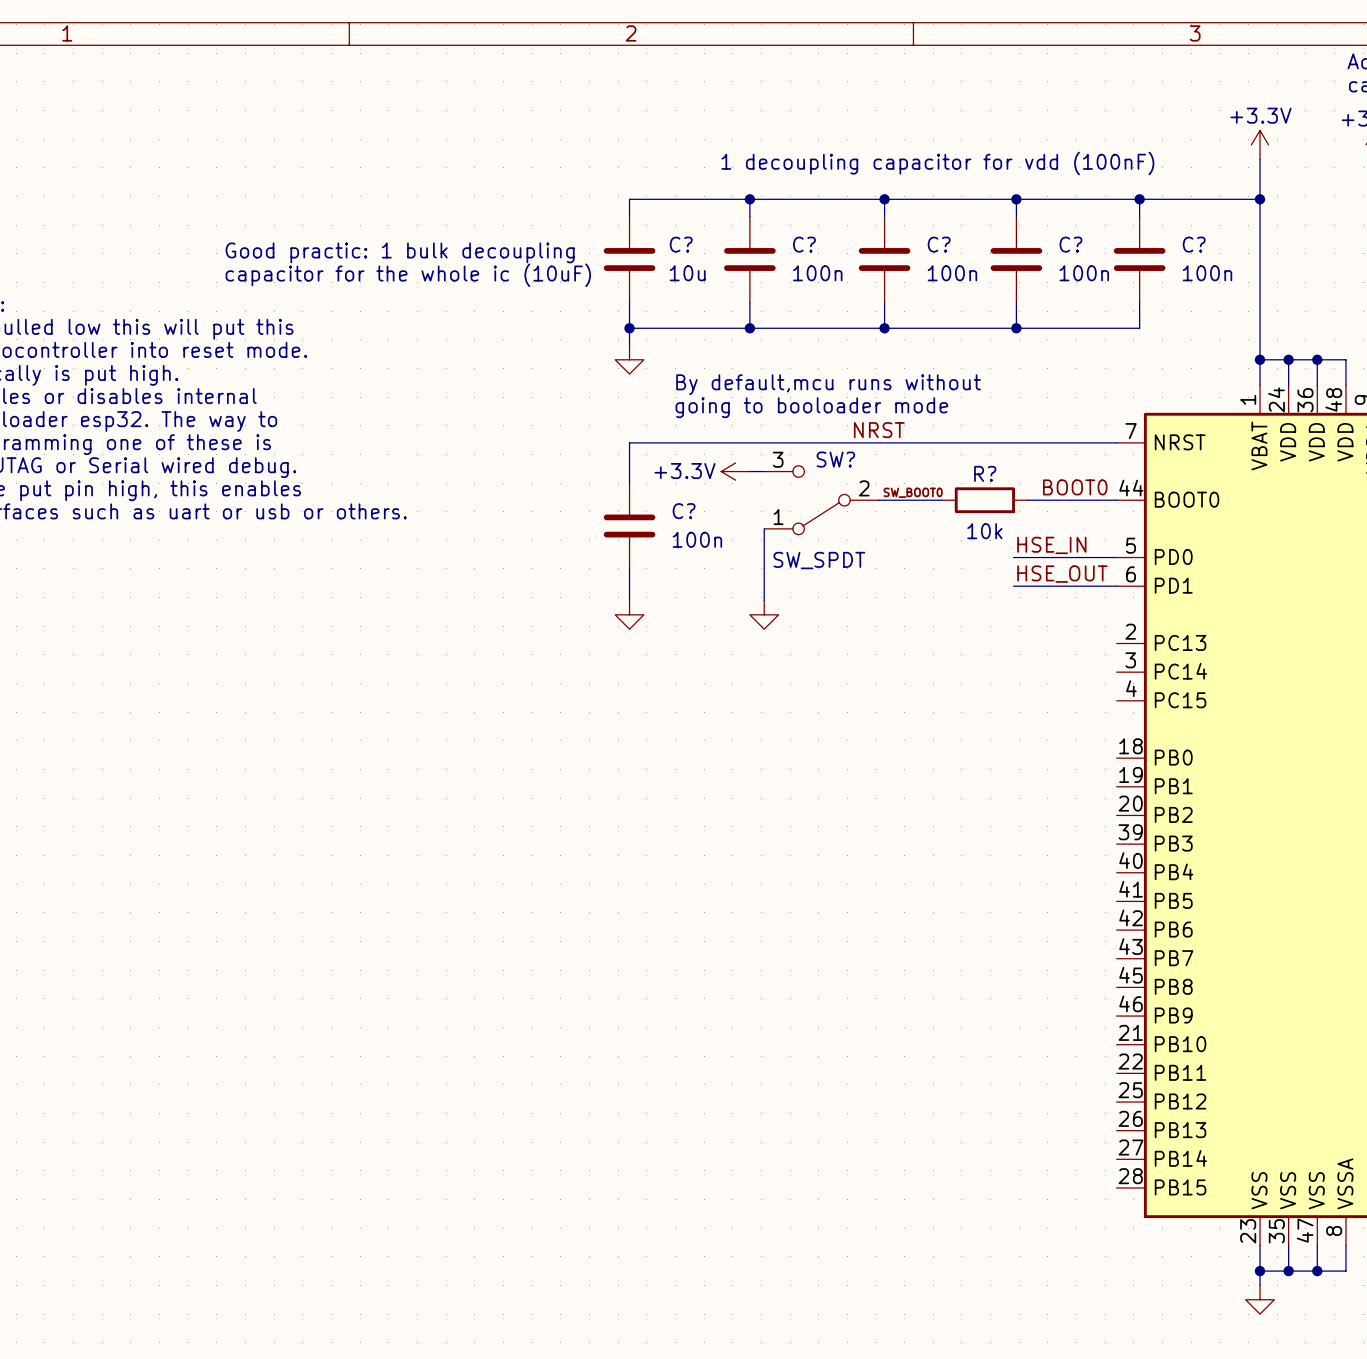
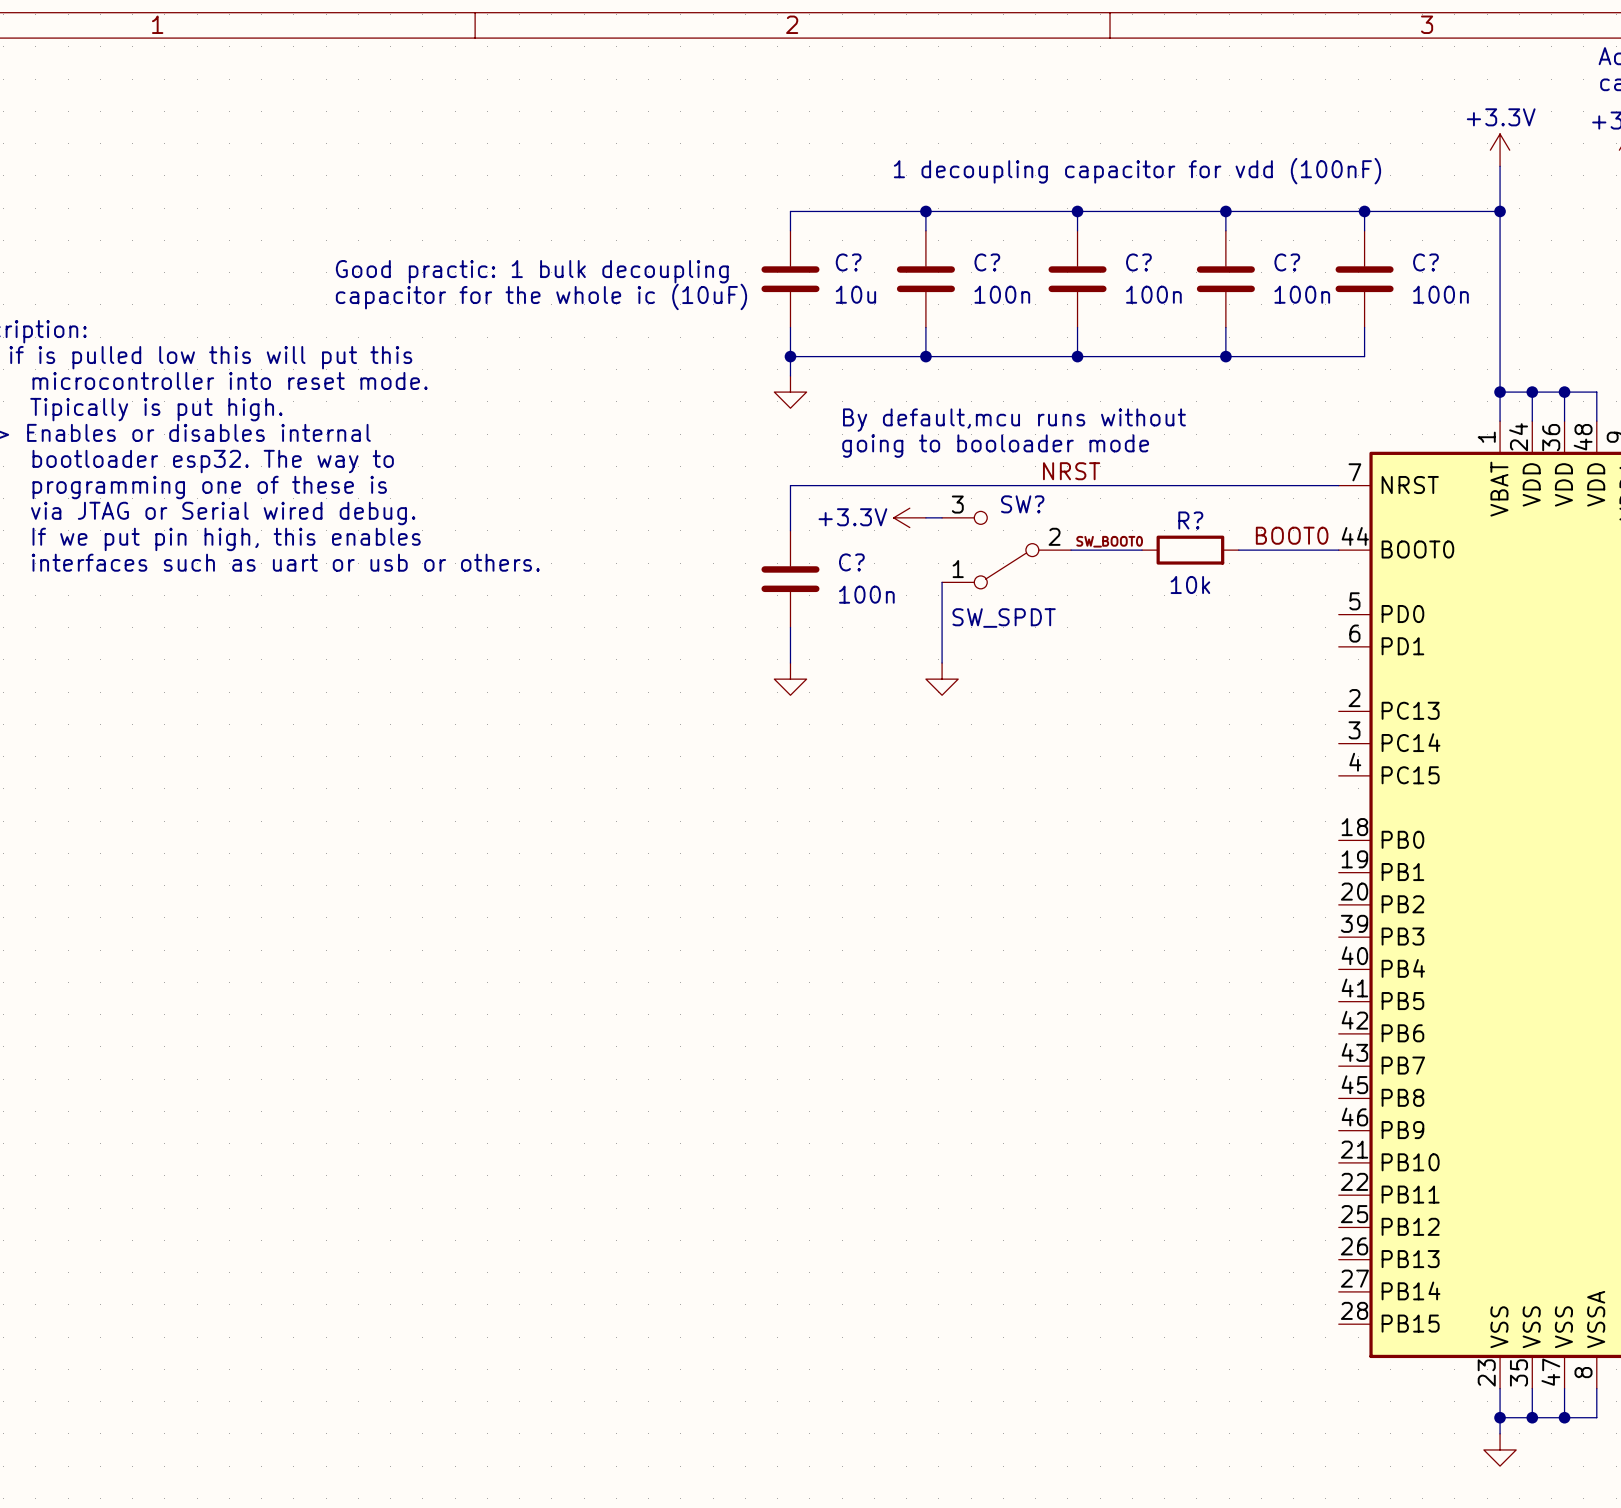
label: HSE_IN (1051, 545) -> none
wire: (1013, 557) (1116, 557) -> none
label: HSE_OUT (1062, 574) -> none
wire: (1013, 586) (1116, 586) -> none

